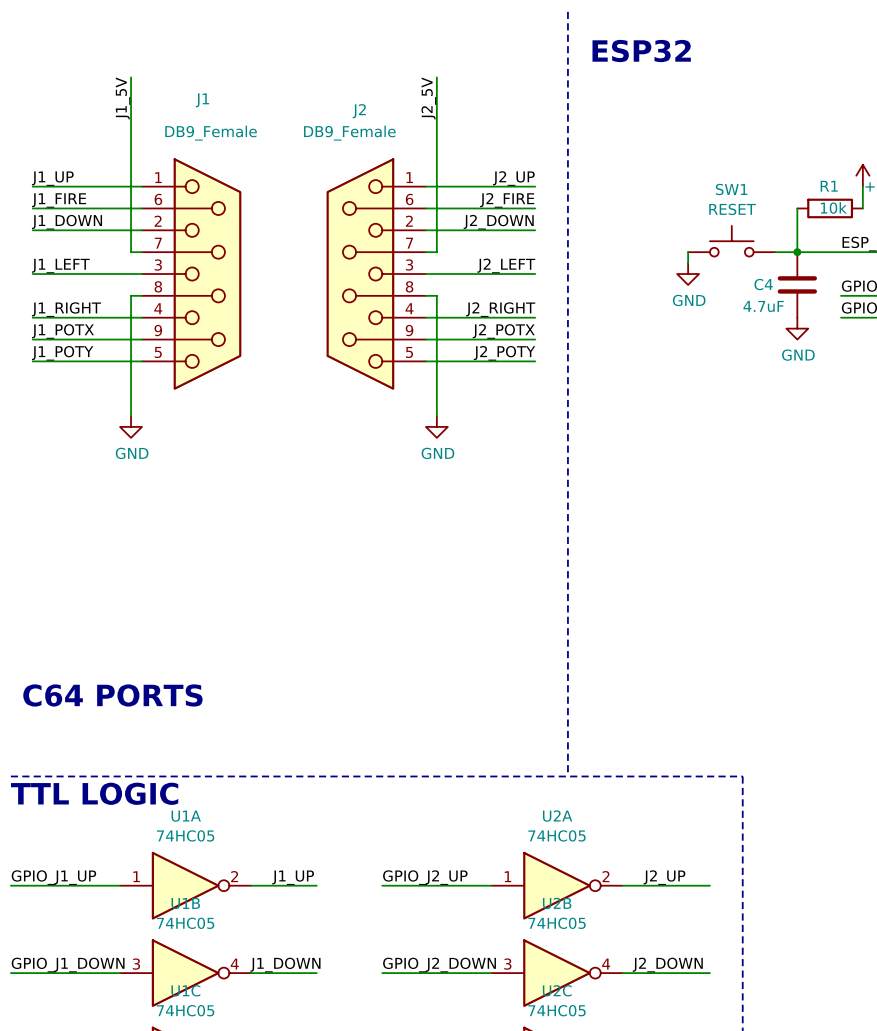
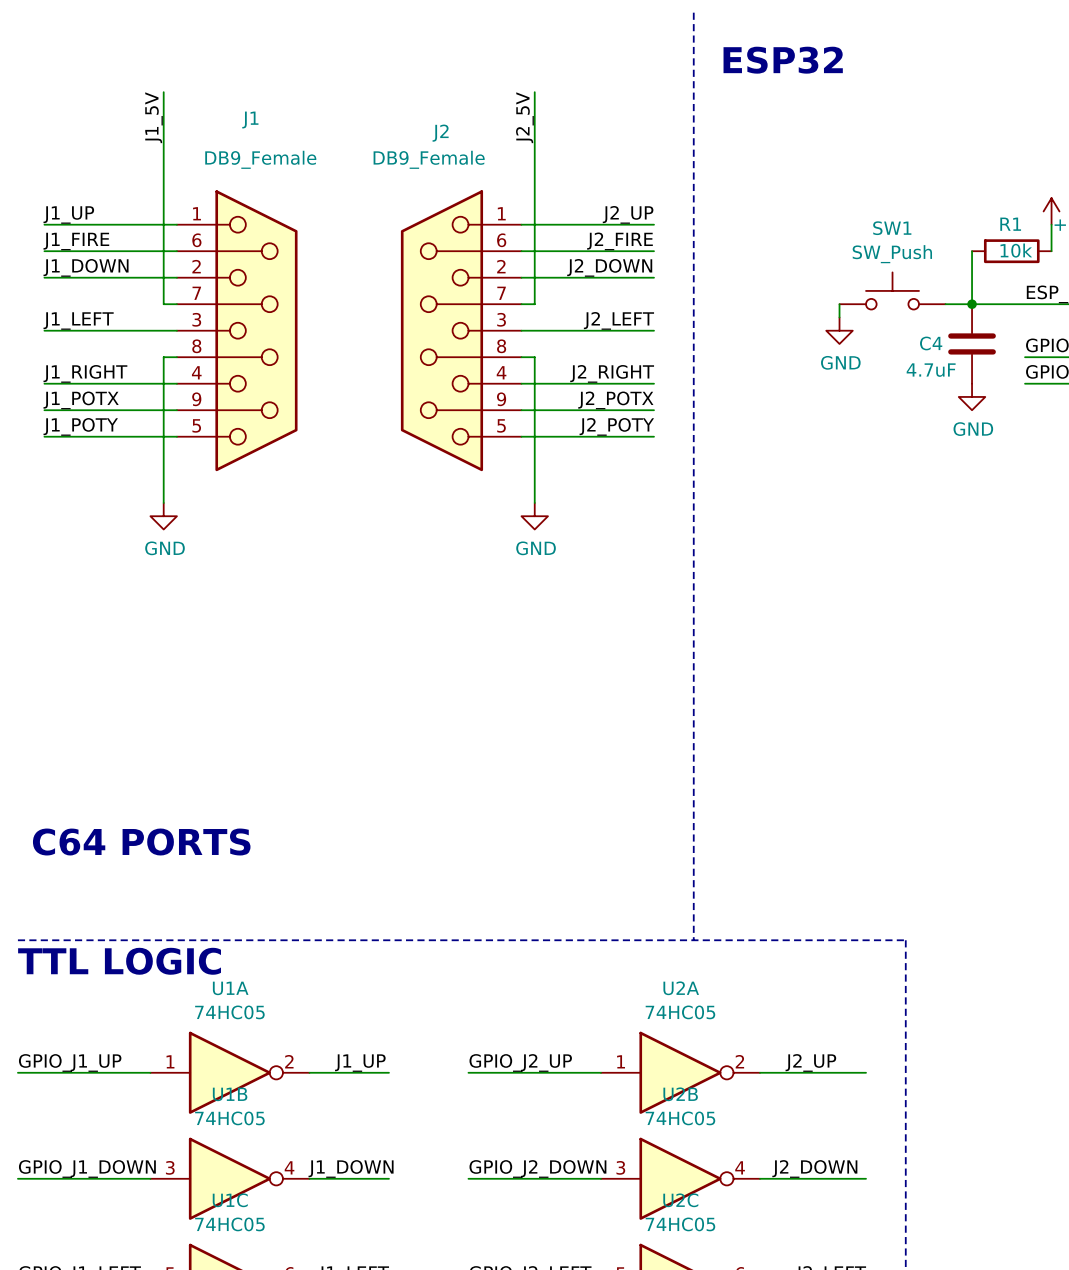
SW1 value: RESET (732, 209) -> SW_Push (892, 254)

